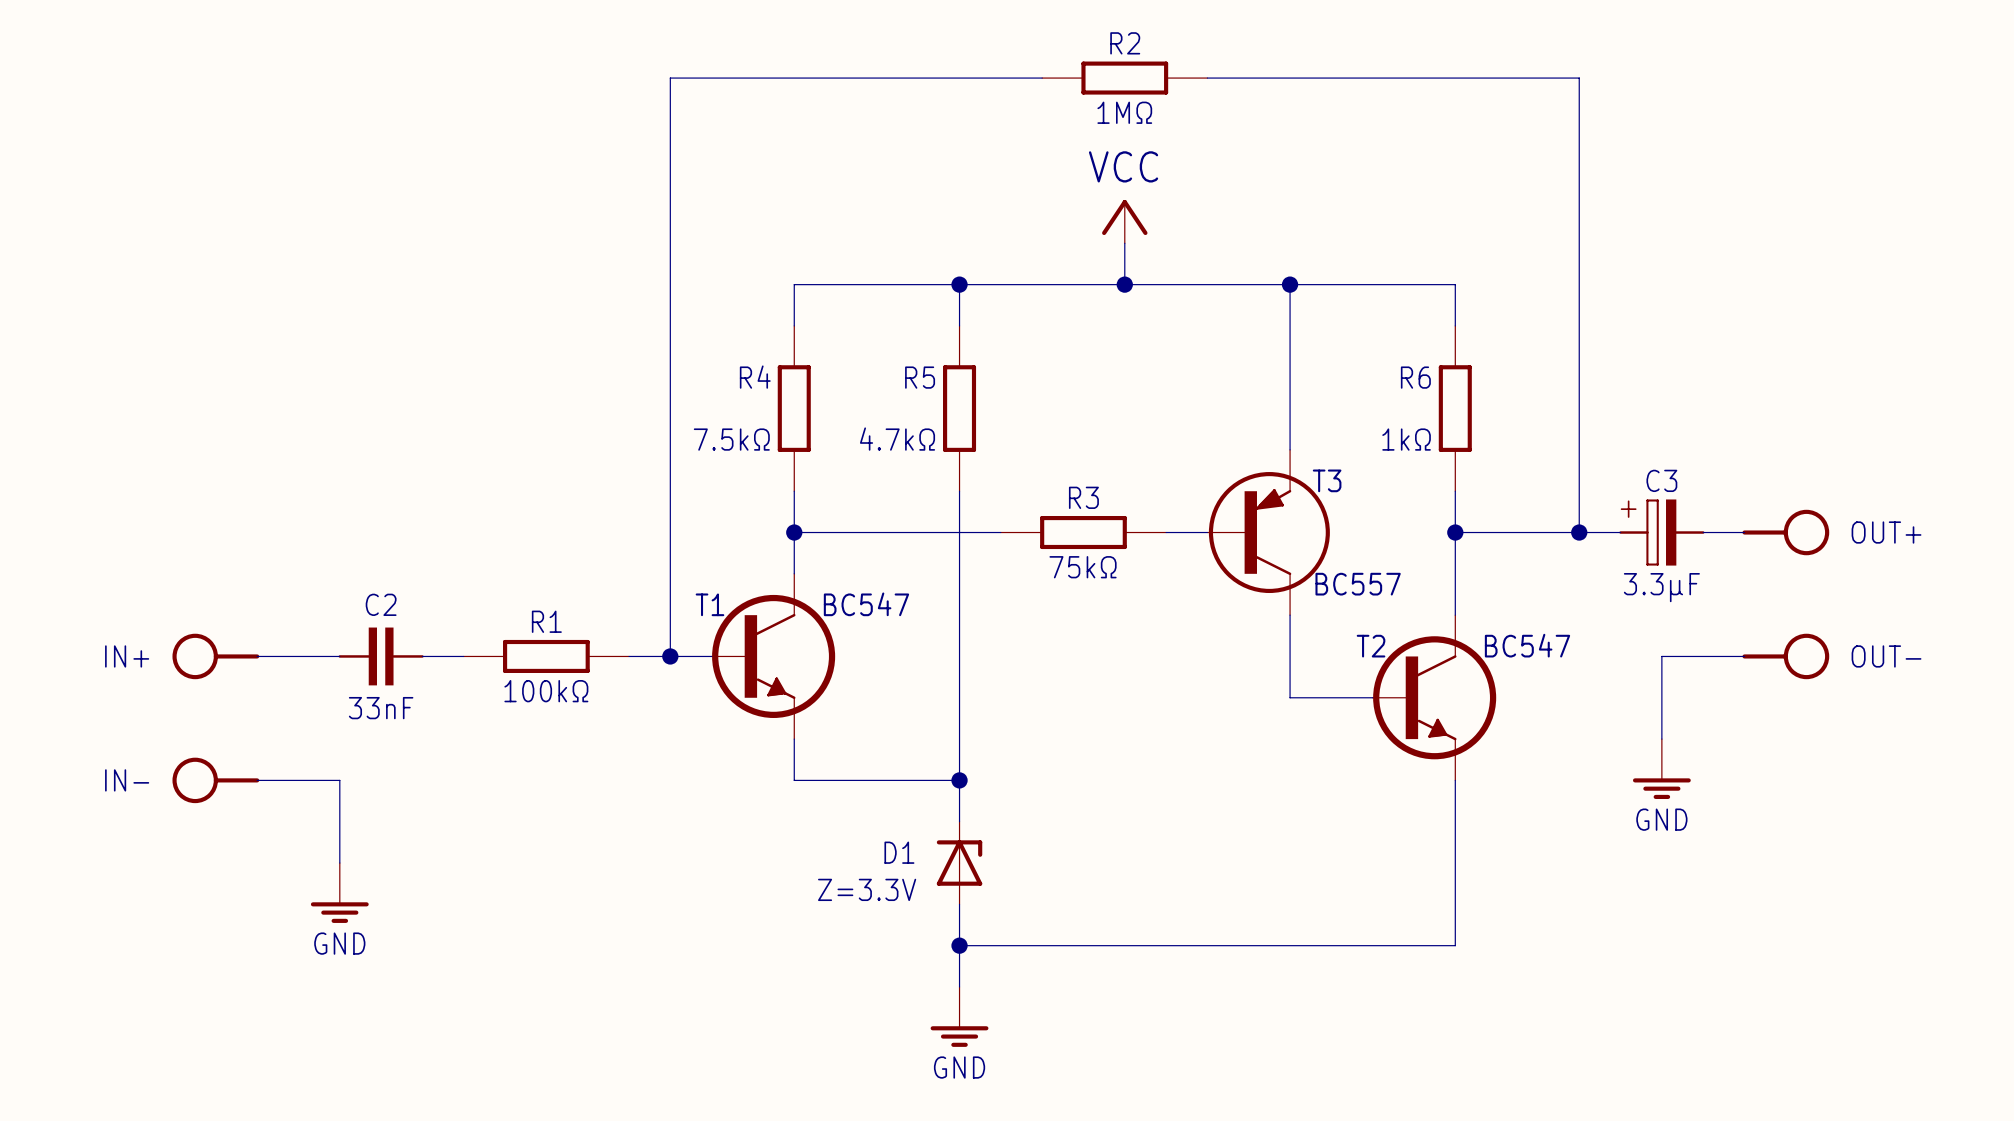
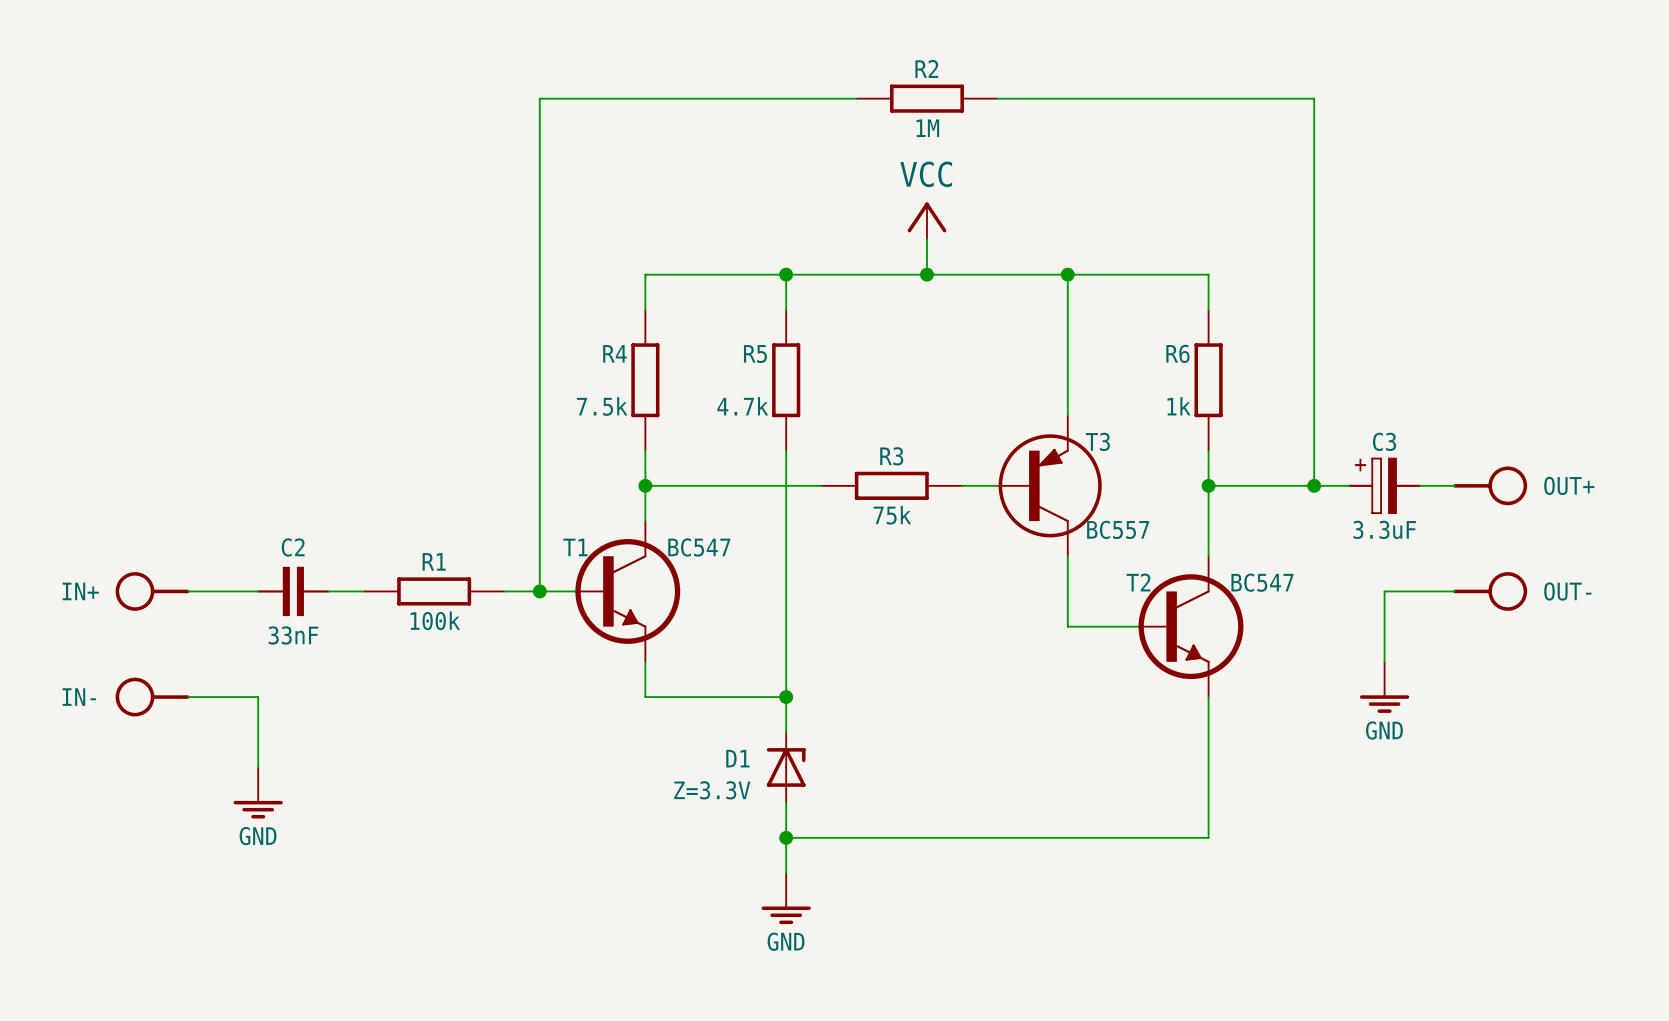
R2 value: 1MΩ (1124, 112) -> 1M (927, 128)
R4 value: 7.5kΩ (731, 439) -> 7.5k (602, 406)
R5 value: 4.7kΩ (897, 439) -> 4.7k (742, 406)
R6 value: 1kΩ (1406, 439) -> 1k (1179, 406)
R3 value: 75kΩ (1083, 567) -> 75k (892, 515)
C3 value: 3.3μF (1661, 587) -> 3.3uF (1384, 529)
R1 value: 100kΩ (546, 691) -> 100k (435, 620)

